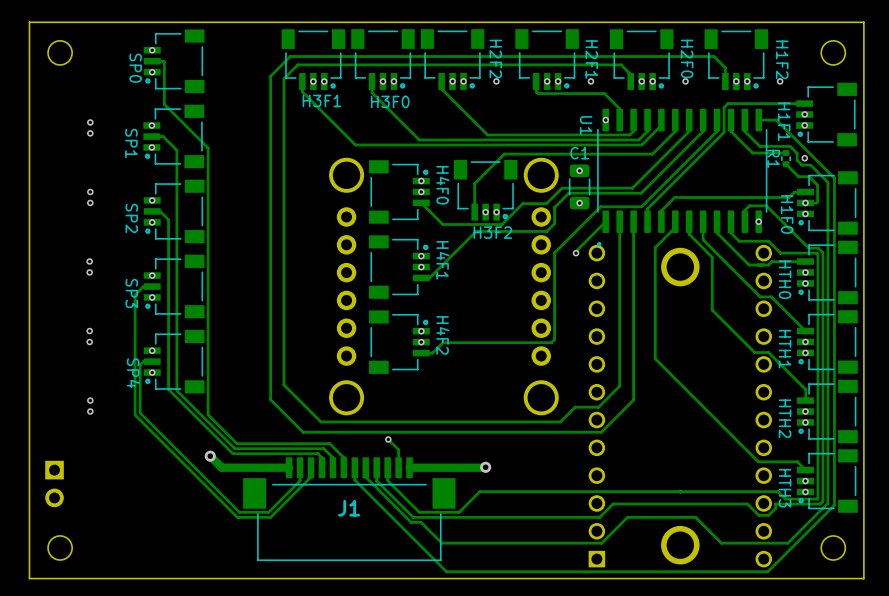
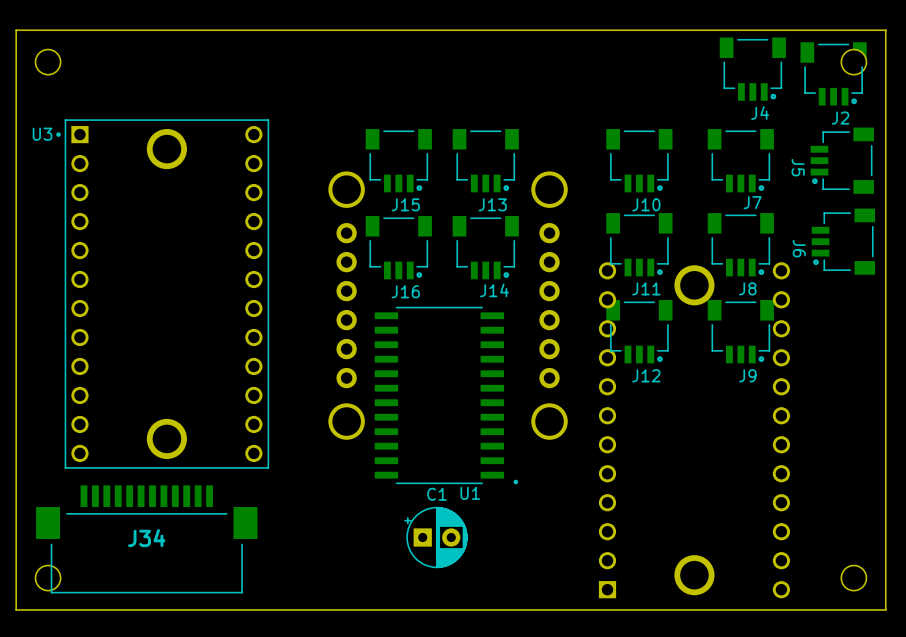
via: (152, 50) -> none
H3F1: (313, 59) -> none
H3F0: (383, 59) -> none
H2F2: (452, 59) -> none
H2F1: (547, 59) -> none
H2F0: (641, 59) -> none
H1F2 name: H1F2 (782, 59) -> J4 (760, 113)
track: (152, 61) (164, 62) (164, 104) (208, 148) (208, 414) (236, 443) (329, 443) (343, 457) (343, 467) -> none
SP0: (174, 61) -> none
J2: none -> (833, 73)
via: (152, 72) -> none
track: (302, 81) (302, 91) (355, 144) (641, 144) (661, 125) (661, 120) -> none
via: (313, 81) -> none
via: (324, 81) -> none
track: (372, 81) (372, 92) (419, 139) (638, 139) (647, 131) (647, 120) -> none
via: (383, 81) -> none
via: (393, 81) -> none
track: (441, 81) (441, 88) (487, 134) (629, 134) (633, 131) (633, 120) -> none
via: (452, 81) -> none
via: (463, 81) -> none
via: (496, 81) -> none
track: (536, 81) (536, 91) (537, 93) (604, 93) (619, 108) (619, 120) -> none
via: (547, 81) -> none
via: (558, 81) -> none
via: (590, 81) -> none
track: (630, 81) (630, 74) (621, 64) (297, 64) (283, 78) (283, 384) (320, 421) (560, 421) (575, 407) (598, 407) (619, 386) (619, 221) -> none
via: (641, 81) -> none
via: (652, 81) -> none
via: (685, 81) -> none
track: (725, 81) (725, 67) (713, 56) (290, 56) (270, 76) (270, 399) (303, 432) (601, 432) (633, 400) (633, 221) -> none
via: (736, 81) -> none
via: (747, 81) -> none
via: (780, 81) -> none
track: (804, 103) (728, 103) (724, 107) (724, 132) (647, 208) (647, 221) -> none
via: (804, 114) -> none
H1F1: (826, 114) -> none
via: (605, 120) -> none
track: (675, 120) (675, 131) (652, 154) (504, 154) (474, 183) (474, 212) -> none
track: (689, 120) (689, 131) (632, 188) (562, 188) (546, 203) (522, 203) (502, 224) (442, 224) (421, 202) -> none
track: (703, 120) (703, 131) (641, 193) (568, 193) (554, 207) (554, 223) (546, 231) (476, 231) (429, 278) (421, 278) -> none
track: (717, 120) (717, 131) (641, 206) (600, 206) (554, 252) (554, 339) (551, 342) (442, 342) (432, 353) (421, 353) -> none
track: (730, 120) (730, 131) (752, 153) (786, 153) -> none
track: (744, 120) (744, 131) (759, 146) (790, 146) (797, 153) (797, 160) (801, 165) (810, 165) (827, 182) (827, 503) (788, 543) (721, 543) (695, 517) (627, 517) (601, 543) (441, 543) (421, 522) (411, 522) (365, 477) (365, 467) -> none
track: (758, 120) (776, 120) (834, 178) (834, 505) (767, 571) (446, 571) (354, 480) (354, 467) -> none
via: (90, 122) -> none
via: (151, 125) -> none
U1 name position: U1 (586, 125) -> U1 (470, 493)
via: (804, 125) -> none
via: (90, 133) -> none
track: (151, 136) (163, 136) (176, 150) (176, 390) (234, 448) (323, 448) (332, 457) (332, 467) -> none
SP1: (173, 136) -> none
via: (151, 147) -> none
J15: none -> (398, 160)
J13: none -> (485, 160)
J10: none -> (639, 160)
J7: none -> (740, 160)
J5: none -> (842, 160)
R1: (786, 158) -> none
via: (804, 158) -> none
C1 footprint: [569, 164, 591, 210] -> [404, 506, 468, 569]
track: (786, 164) (798, 176) (809, 176) (817, 185) (817, 202) (805, 202) -> none
via: (579, 170) -> none
U1 rotation: 0° (682, 177) -> 90° counterclockwise (446, 395)
U1 position: (682, 177) -> (446, 395)
via: (421, 181) -> none
H3F2: (485, 190) -> none
via: (90, 191) -> none
H4F0: (399, 191) -> none
via: (421, 191) -> none
track: (805, 192) (794, 192) (789, 197) (674, 197) (661, 210) (661, 221) -> none
via: (152, 200) -> none
via: (90, 202) -> none
via: (805, 202) -> none
H1F0: (827, 202) -> none
via: (579, 203) -> none
track: (152, 211) (160, 211) (168, 219) (168, 389) (232, 453) (317, 453) (321, 457) (321, 467) -> none
SP2: (174, 211) -> none
via: (485, 212) -> none
via: (496, 212) -> none
via: (805, 213) -> none
track: (605, 221) (576, 253) -> none
track: (675, 221) (675, 227) (655, 247) (655, 358) (758, 461) (797, 461) (805, 470) -> none
track: (689, 221) (689, 234) (712, 257) (712, 310) (754, 352) (768, 352) (805, 389) (805, 400) -> none
track: (703, 221) (703, 239) (760, 296) (771, 296) (805, 331) -> none
track: (717, 221) (717, 232) (749, 265) (768, 265) (772, 261) (805, 261) -> none
track: (730, 221) (730, 232) (739, 241) (768, 241) (780, 253) (816, 253) (817, 254) (817, 499) (785, 499) (777, 491) (479, 491) (459, 512) (419, 512) (387, 480) (387, 467) -> none
track: (744, 221) (744, 210) (749, 205) (766, 205) (808, 248) (818, 248) (822, 252) (822, 501) (820, 504) (775, 504) (775, 508) (768, 515) (758, 515) (747, 504) (613, 504) (599, 517) (413, 517) (376, 480) (376, 467) -> none
via: (758, 221) -> none
via: (152, 222) -> none
J6: none -> (843, 241)
J11: none -> (639, 244)
J8: none -> (740, 244)
J16: none -> (398, 247)
J14: none -> (485, 247)
via: (576, 253) -> none
via: (421, 256) -> none
via: (89, 261) -> none
H4F1: (399, 267) -> none
via: (421, 267) -> none
via: (89, 272) -> none
via: (805, 272) -> none
HTH0: (827, 272) -> none
via: (152, 275) -> none
U3: none -> (162, 294)
via: (805, 283) -> none
track: (152, 286) (143, 286) (135, 294) (135, 415) (237, 517) (270, 517) (311, 477) (311, 467) -> none
SP3: (174, 286) -> none
via: (152, 297) -> none
J12: none -> (639, 331)
J9: none -> (740, 331)
via: (89, 331) -> none
via: (421, 331) -> none
via: (89, 341) -> none
via: (805, 341) -> none
HTH1: (827, 341) -> none
H4F2: (399, 342) -> none
via: (421, 342) -> none
via: (152, 350) -> none
via: (805, 352) -> none
track: (152, 361) (143, 361) (140, 365) (140, 412) (239, 512) (268, 512) (300, 480) (300, 467) -> none
SP4: (174, 361) -> none
via: (152, 372) -> none
via: (90, 400) -> none
via: (90, 411) -> none
via: (805, 411) -> none
HTH2: (827, 411) -> none
via: (805, 422) -> none
track: (388, 439) (398, 449) (398, 467) -> none
via: (388, 439) -> none
track: (210, 456) (221, 467) (289, 467) -> none
via: (210, 456) -> none
track: (485, 467) (409, 467) -> none
via: (485, 467) -> none
via: (805, 481) -> none
HTH3: (827, 481) -> none
part: (54, 484) -> none
via: (805, 492) -> none
J1: (349, 509) -> none
J34: none -> (146, 539)

